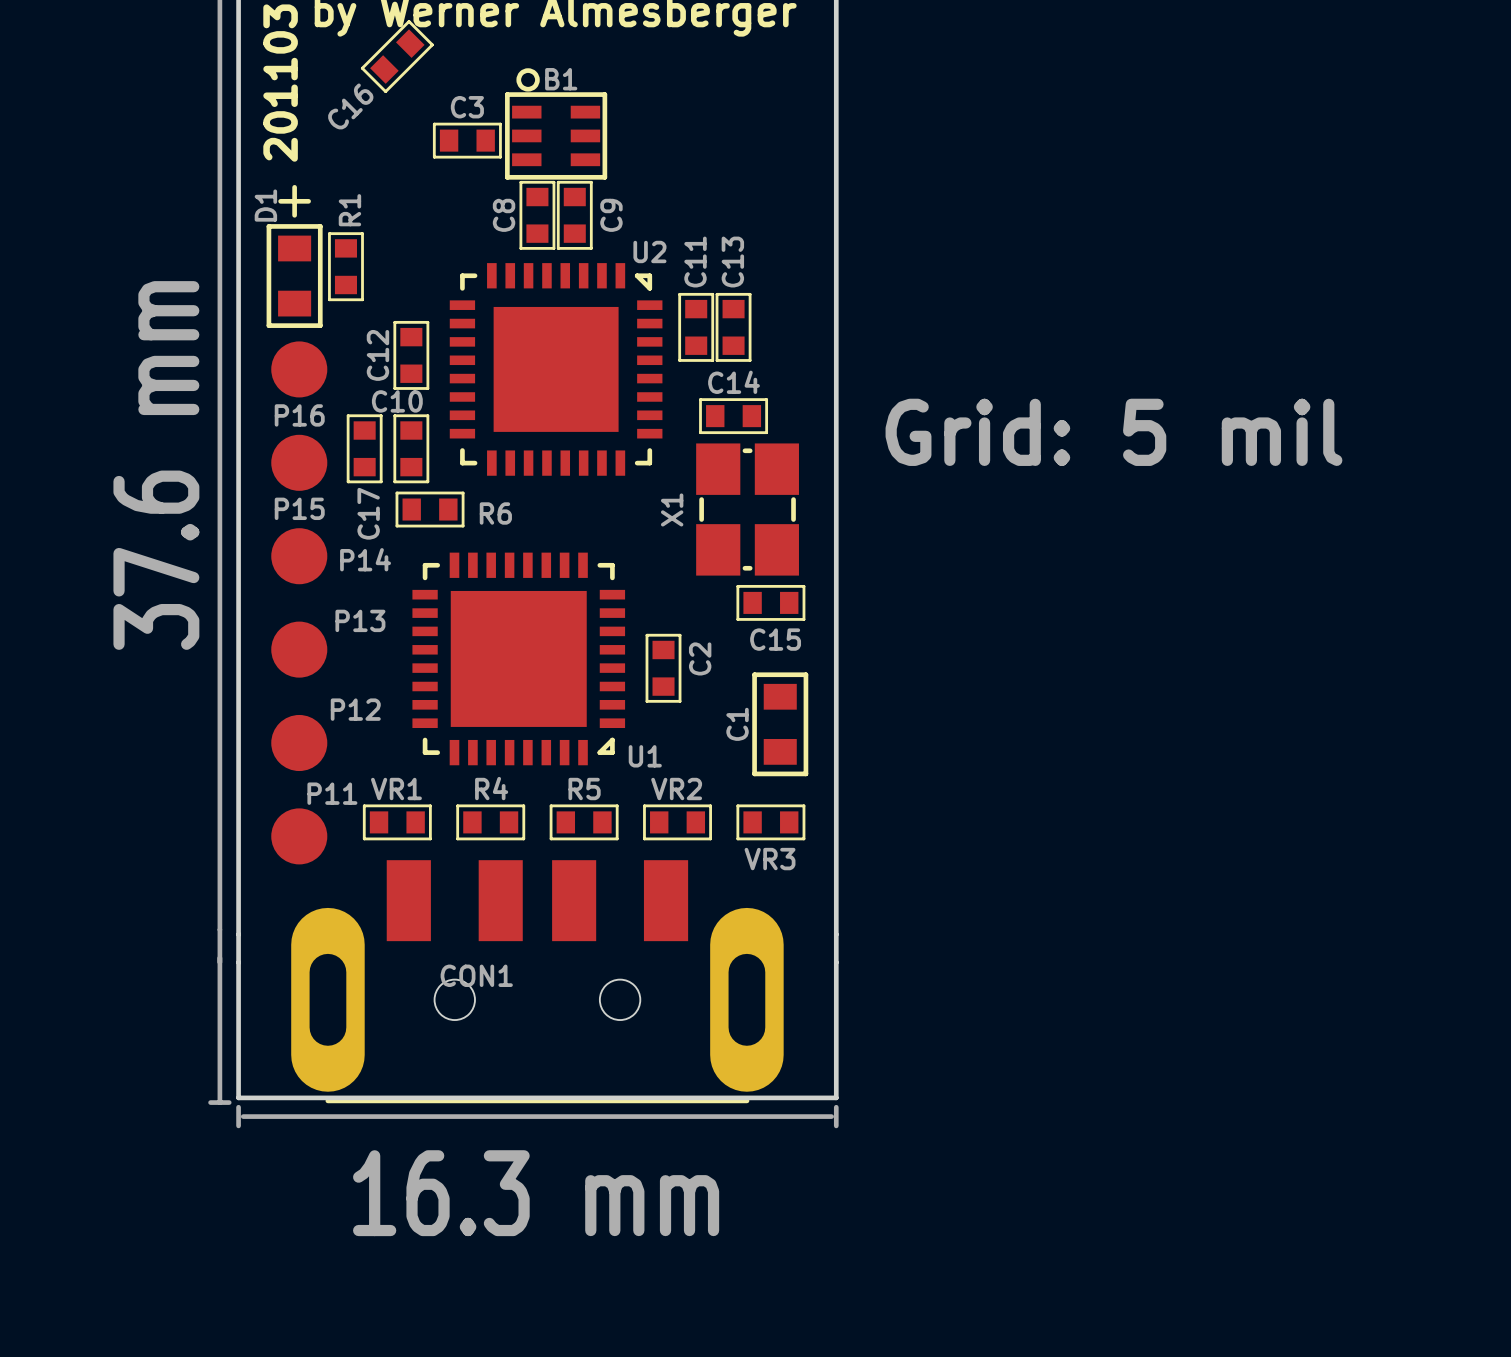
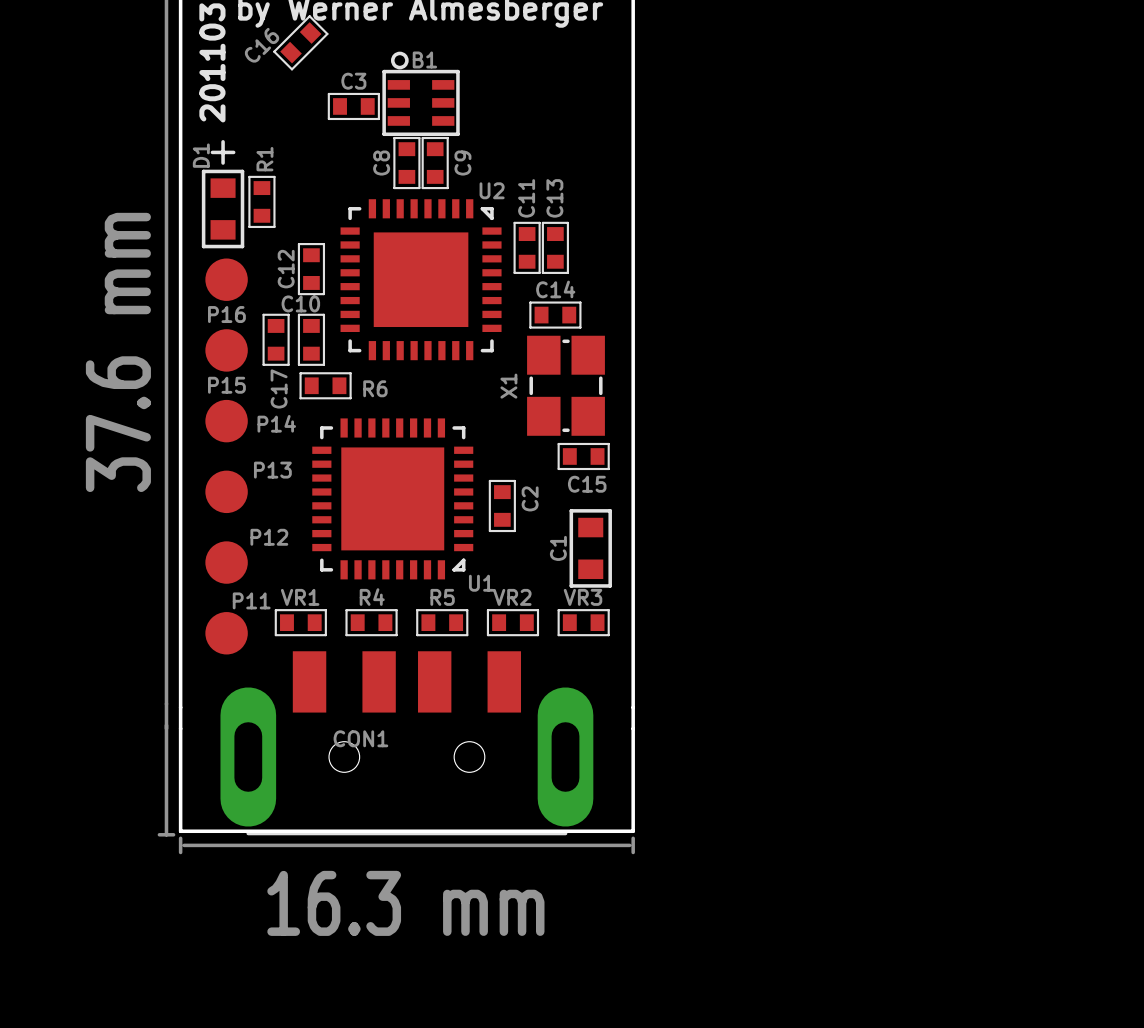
C16 name position: C16 (350, 106) -> C16 (262, 45)
text: Grid: 5 mil (1113, 432) -> none
U1 name position: U1 (645, 756) -> U1 (481, 583)
VR3 name position: VR3 (770, 859) -> VR3 (583, 597)

